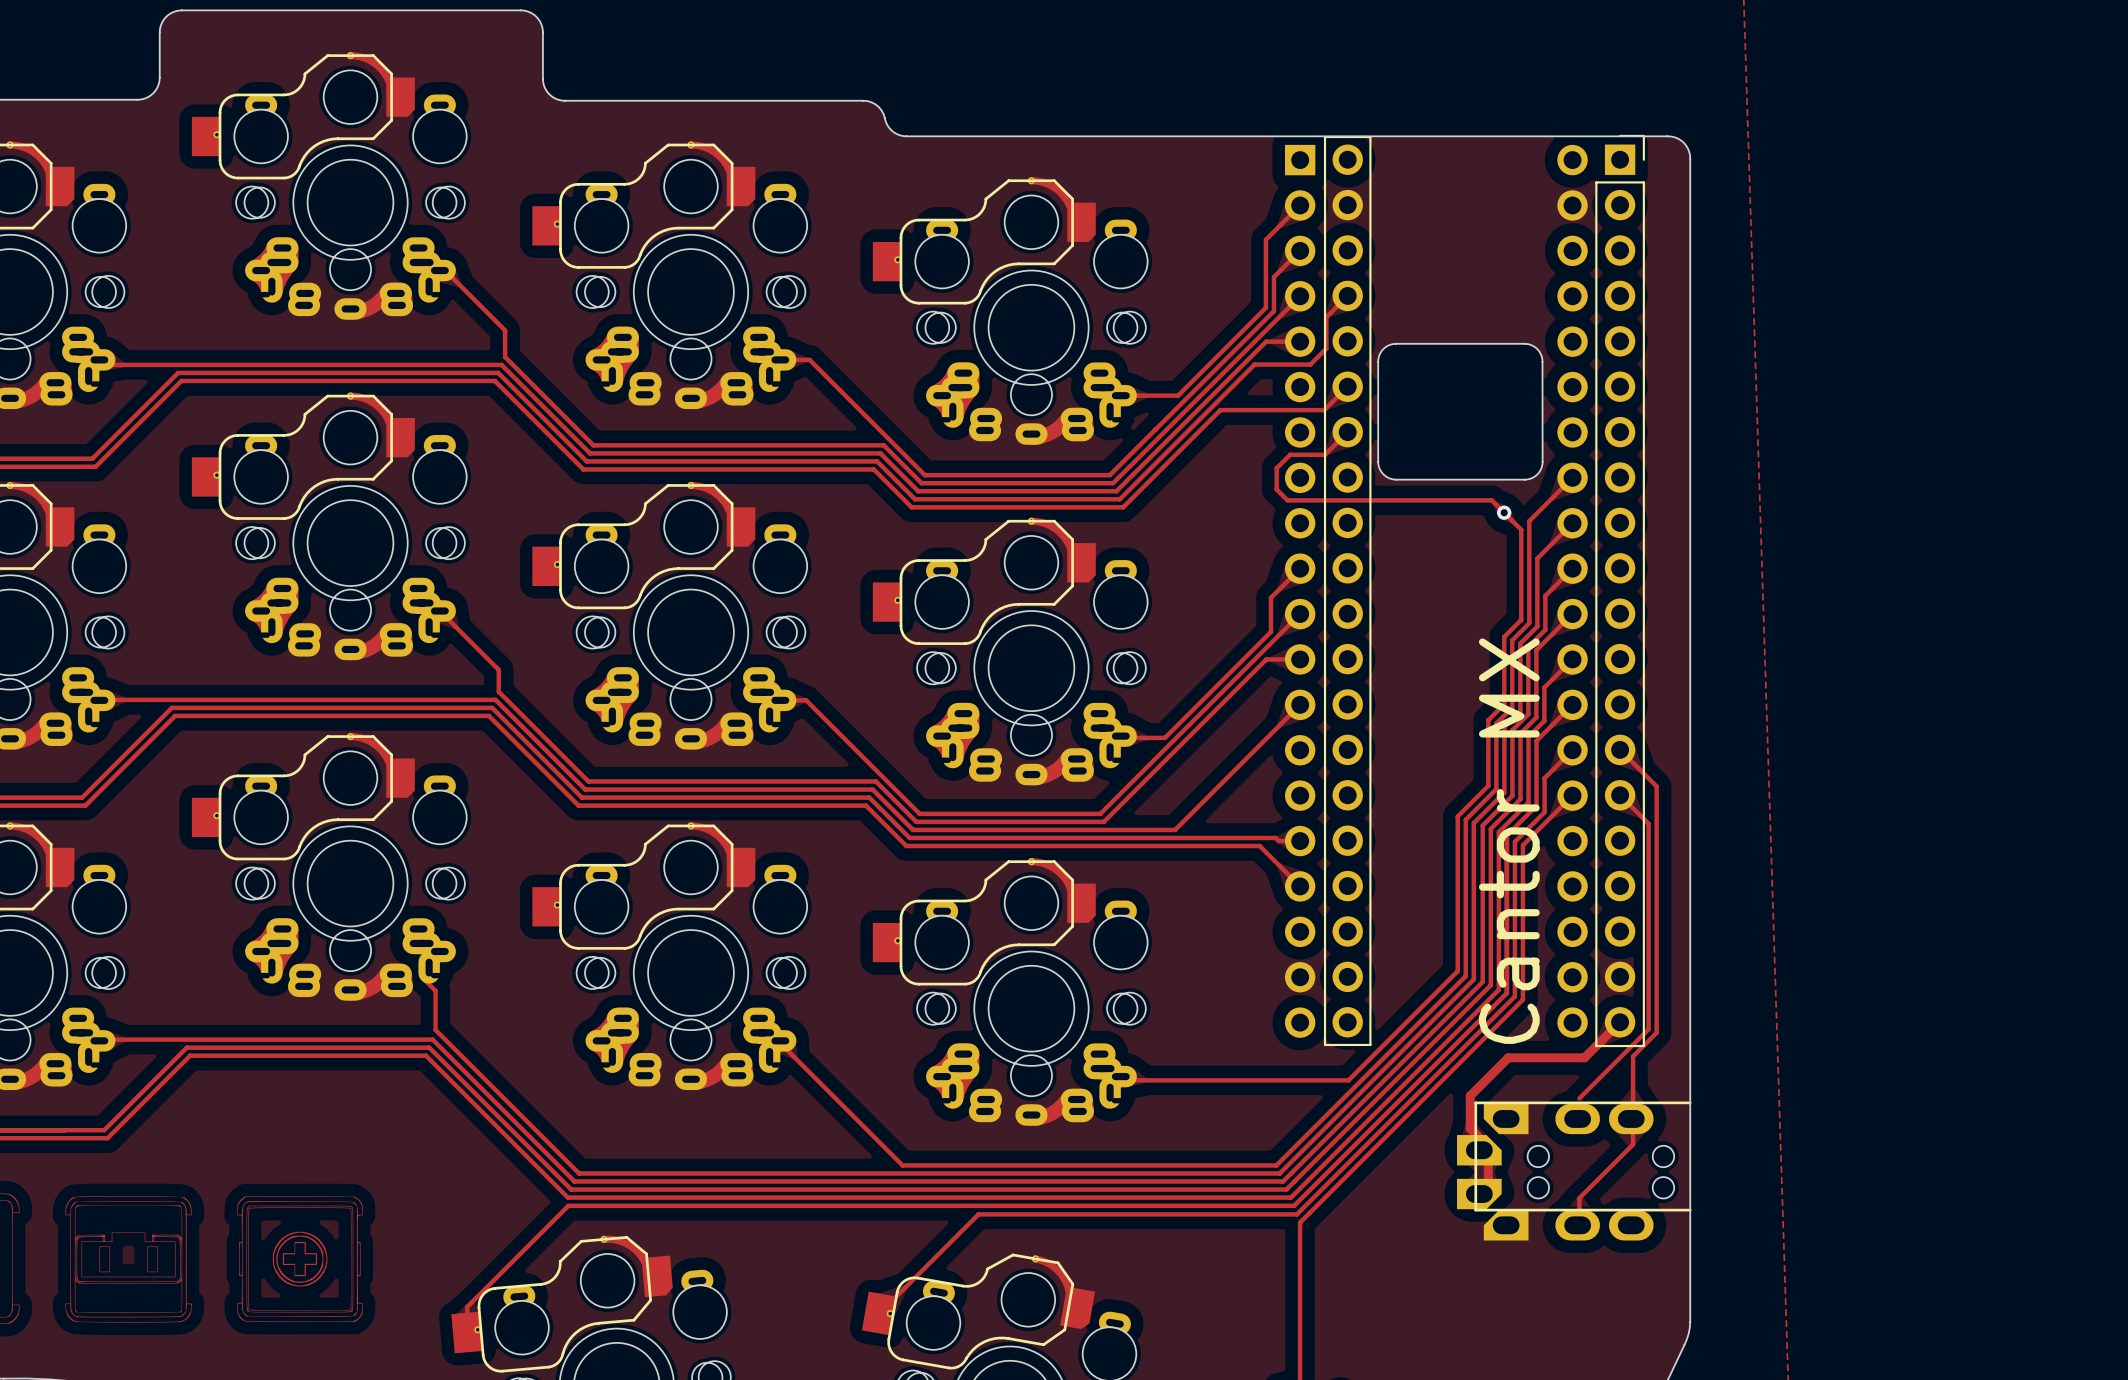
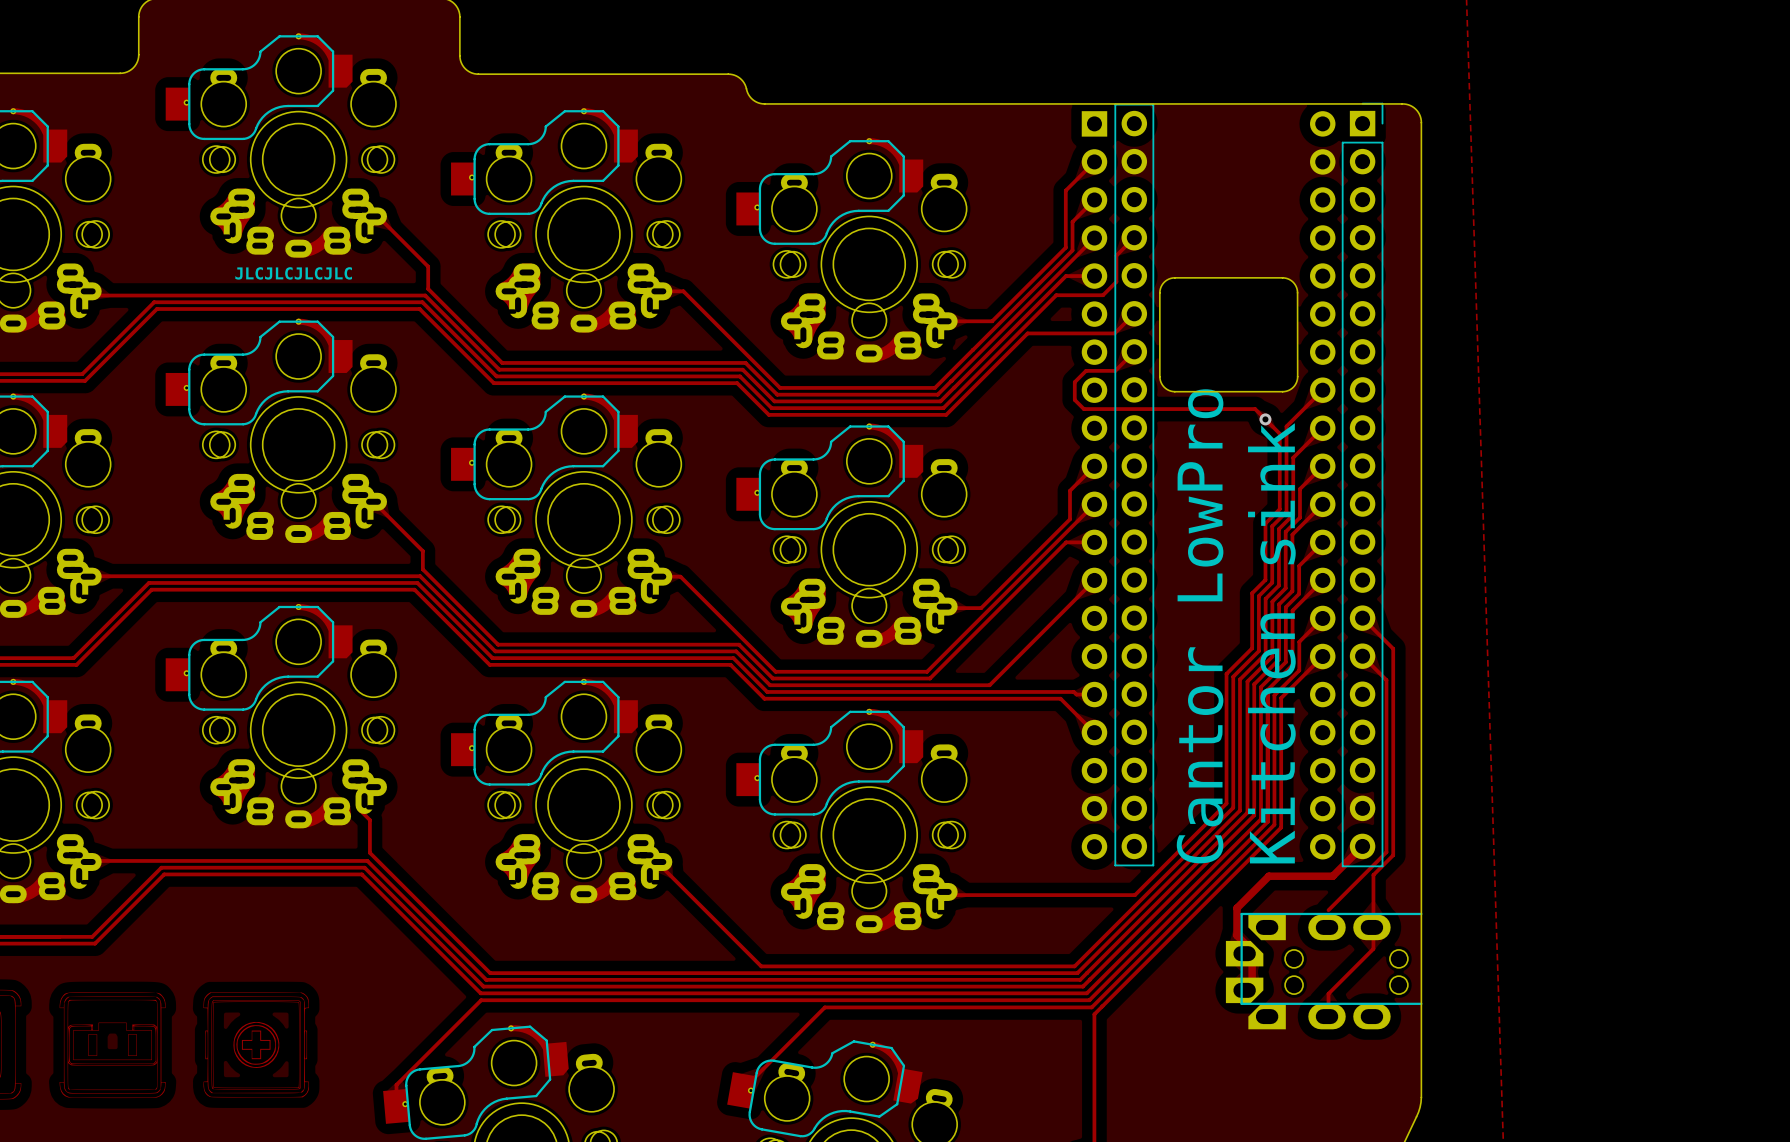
text: none -> JLCJLCJLCJLC (293, 273)
text: none -> Kitchen sink (1271, 643)
text: Cantor MX (1509, 841) -> Cantor LowPro (1200, 626)

